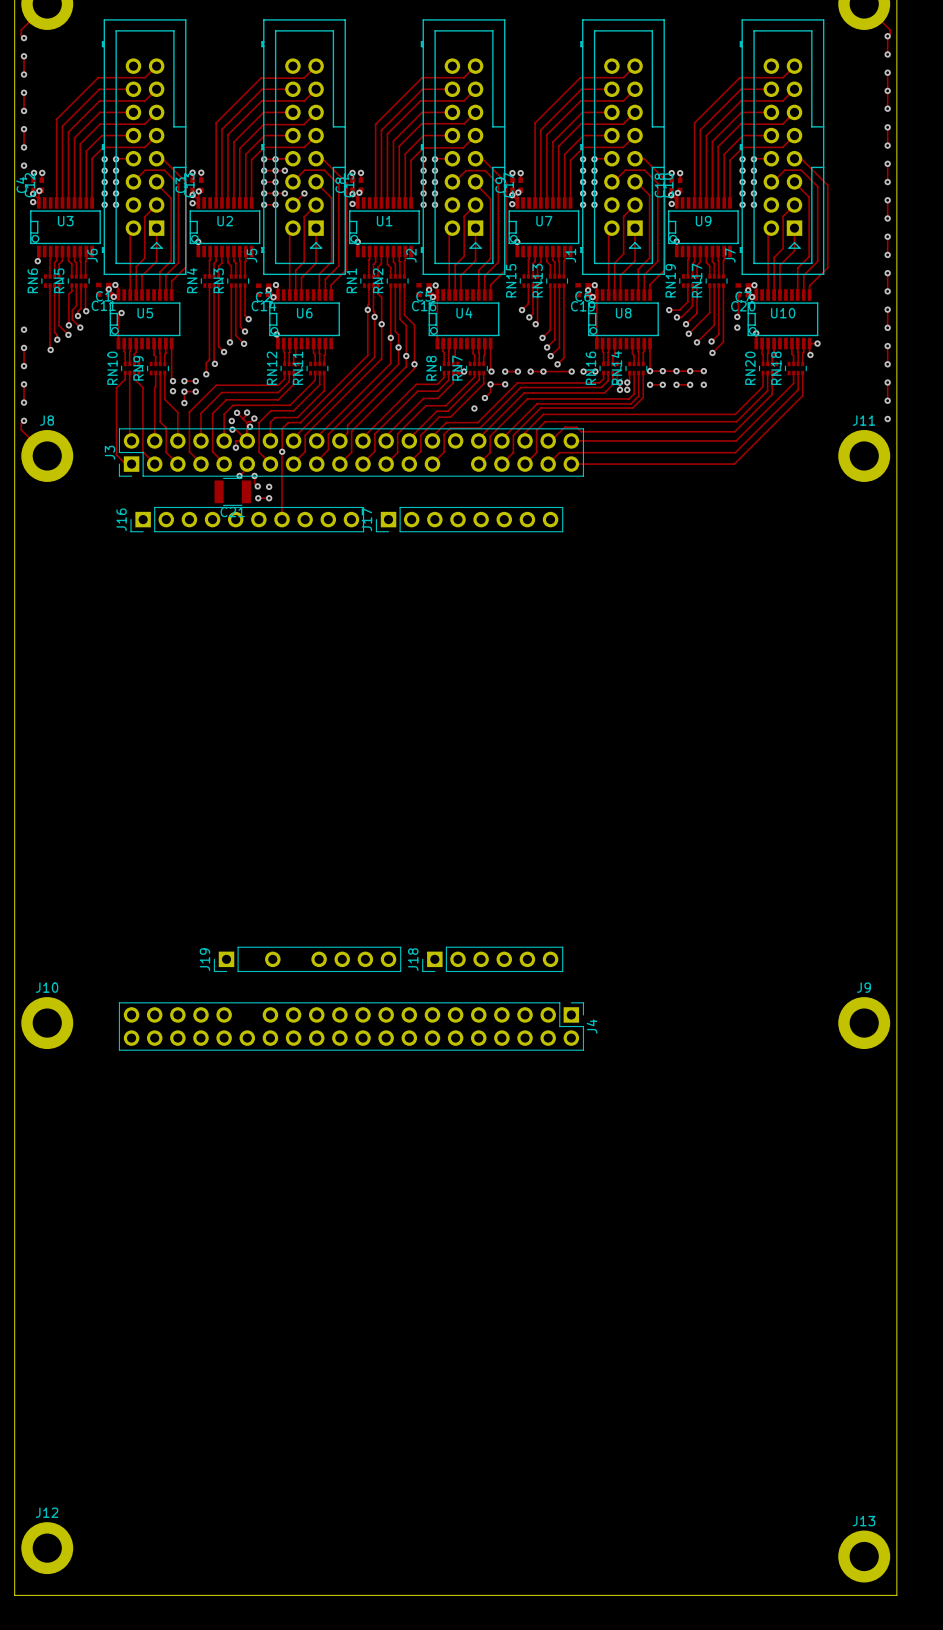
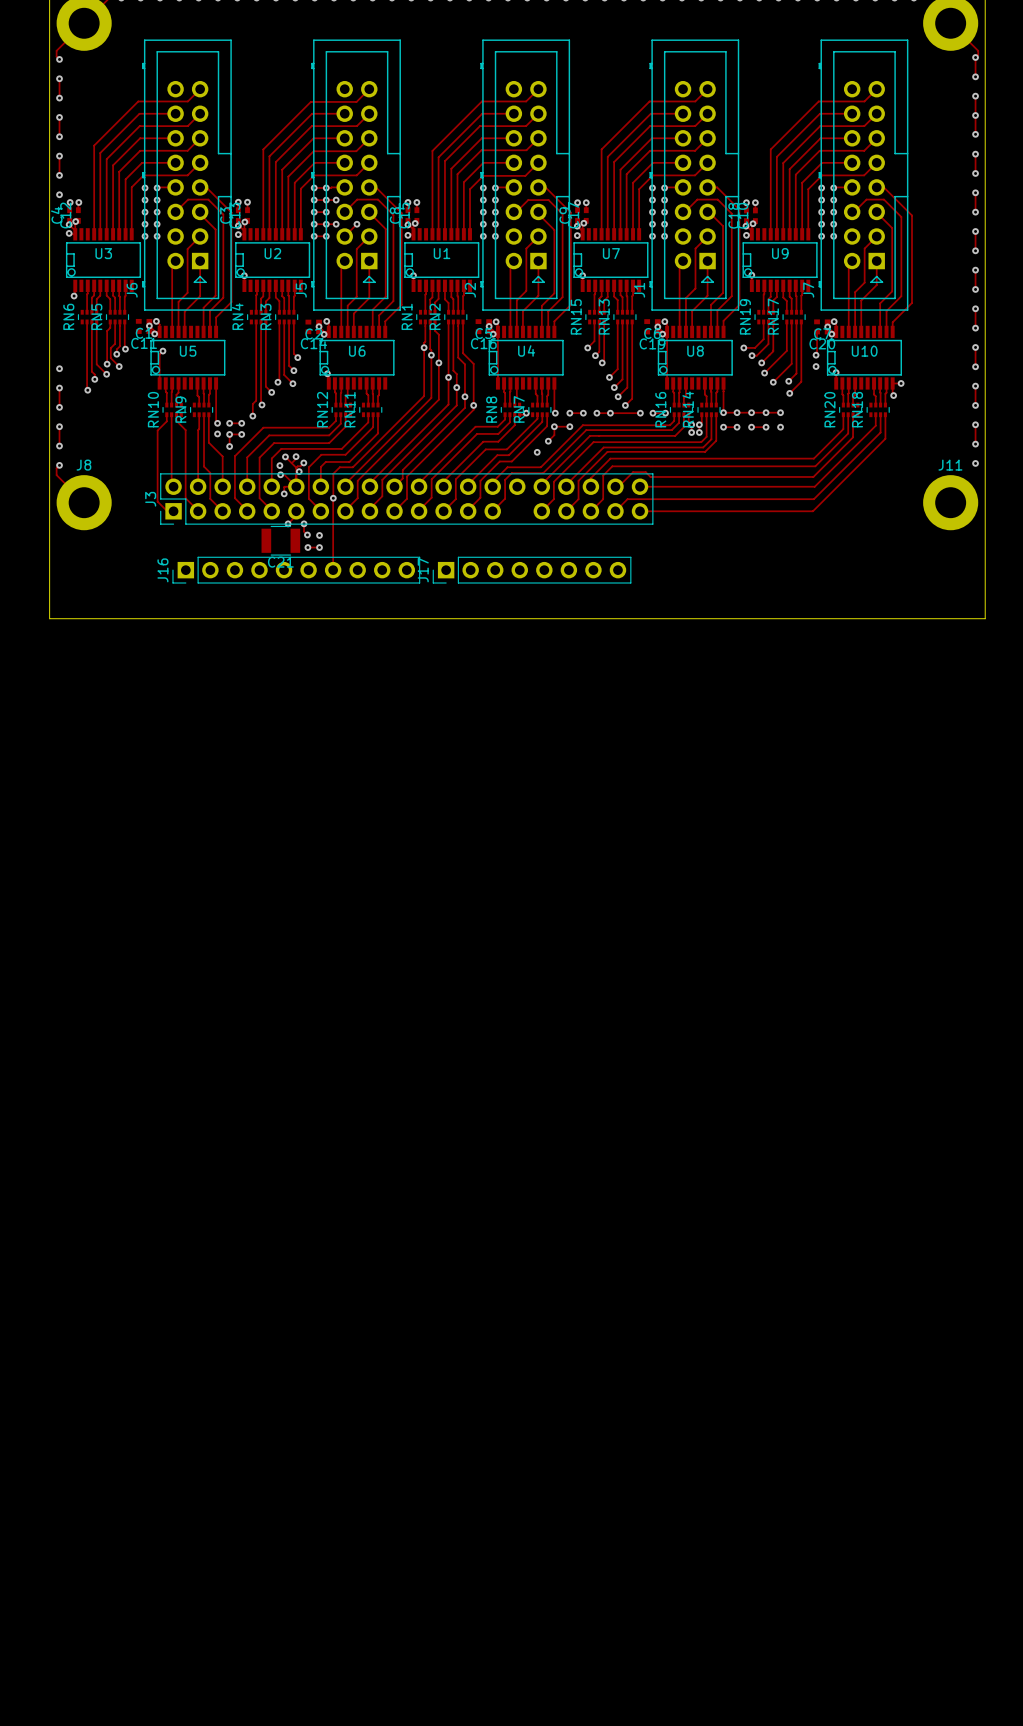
board edge: (14, 565) (14, 1595) (896, 1595) (896, 565) -> (49, 618) (985, 618)
J19: (307, 959) -> none
J18: (492, 959) -> none
J10: (47, 1023) -> none
J9: (864, 1023) -> none
J4: (351, 1026) -> none
J12: (47, 1548) -> none
J13: (864, 1556) -> none

